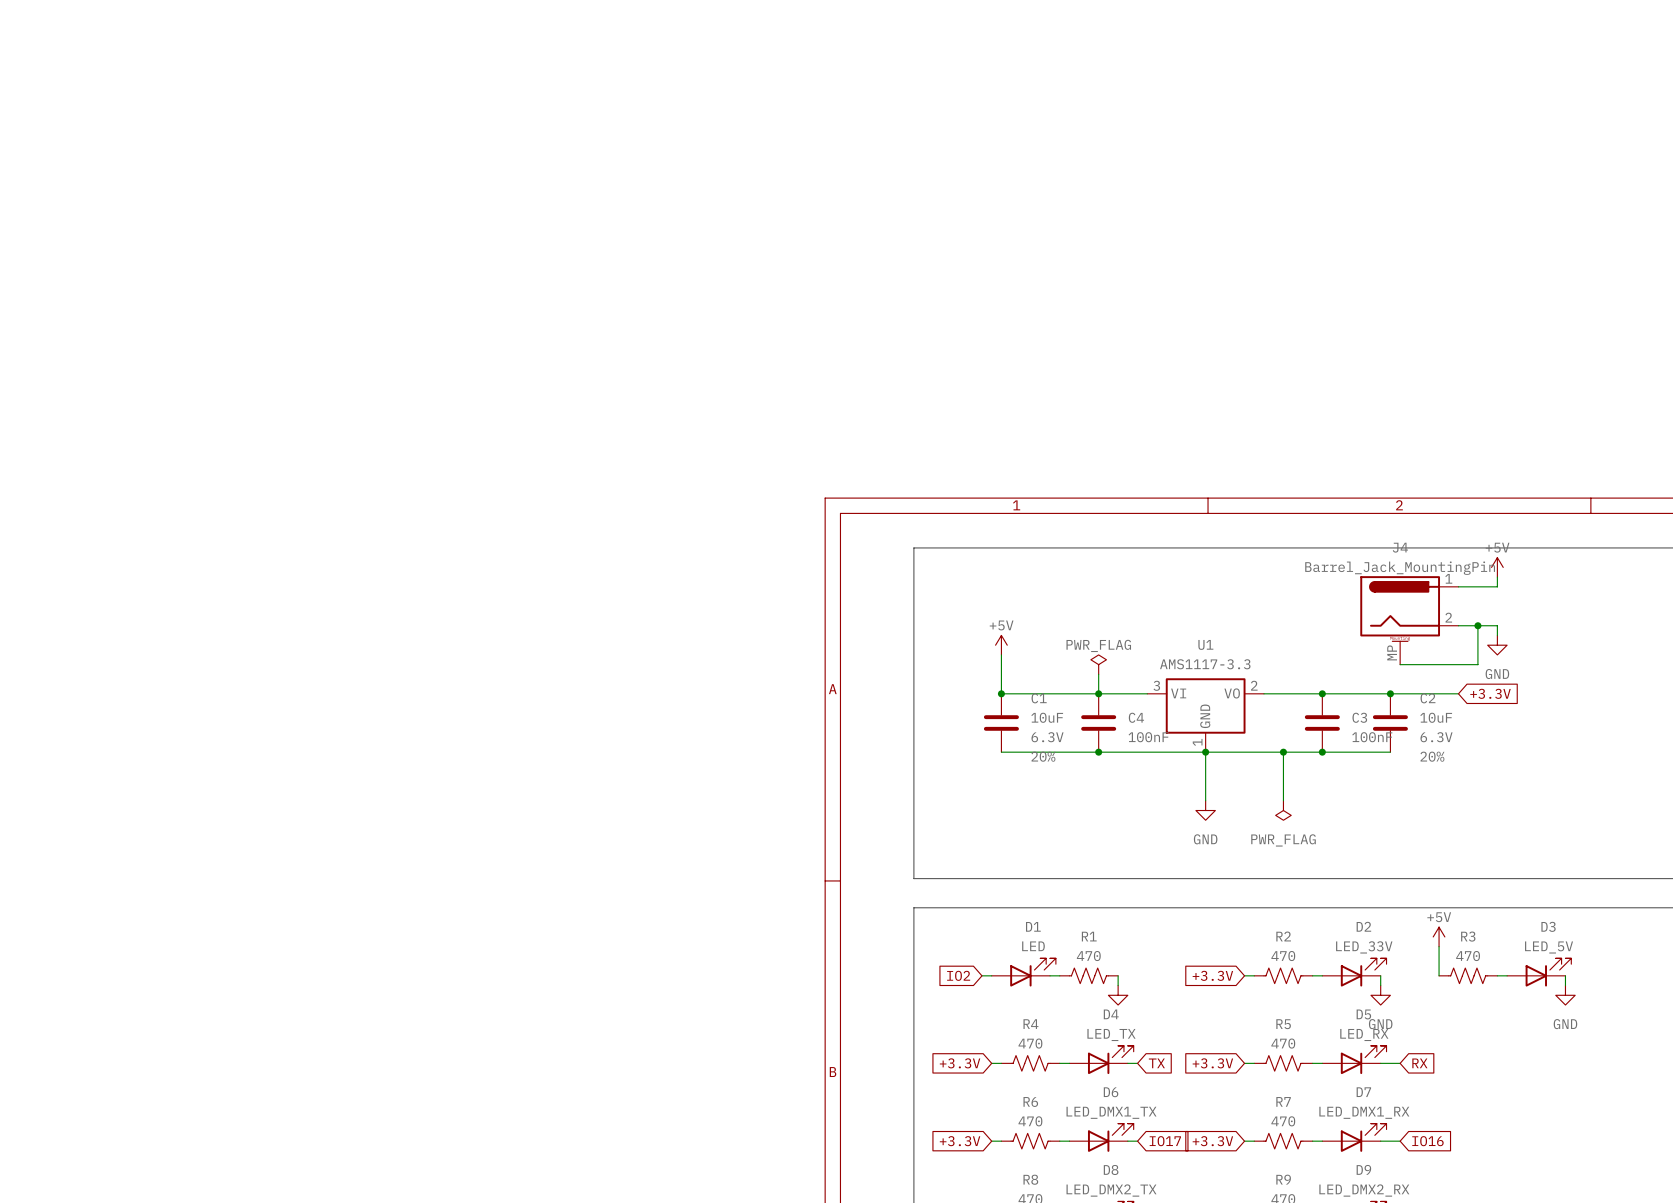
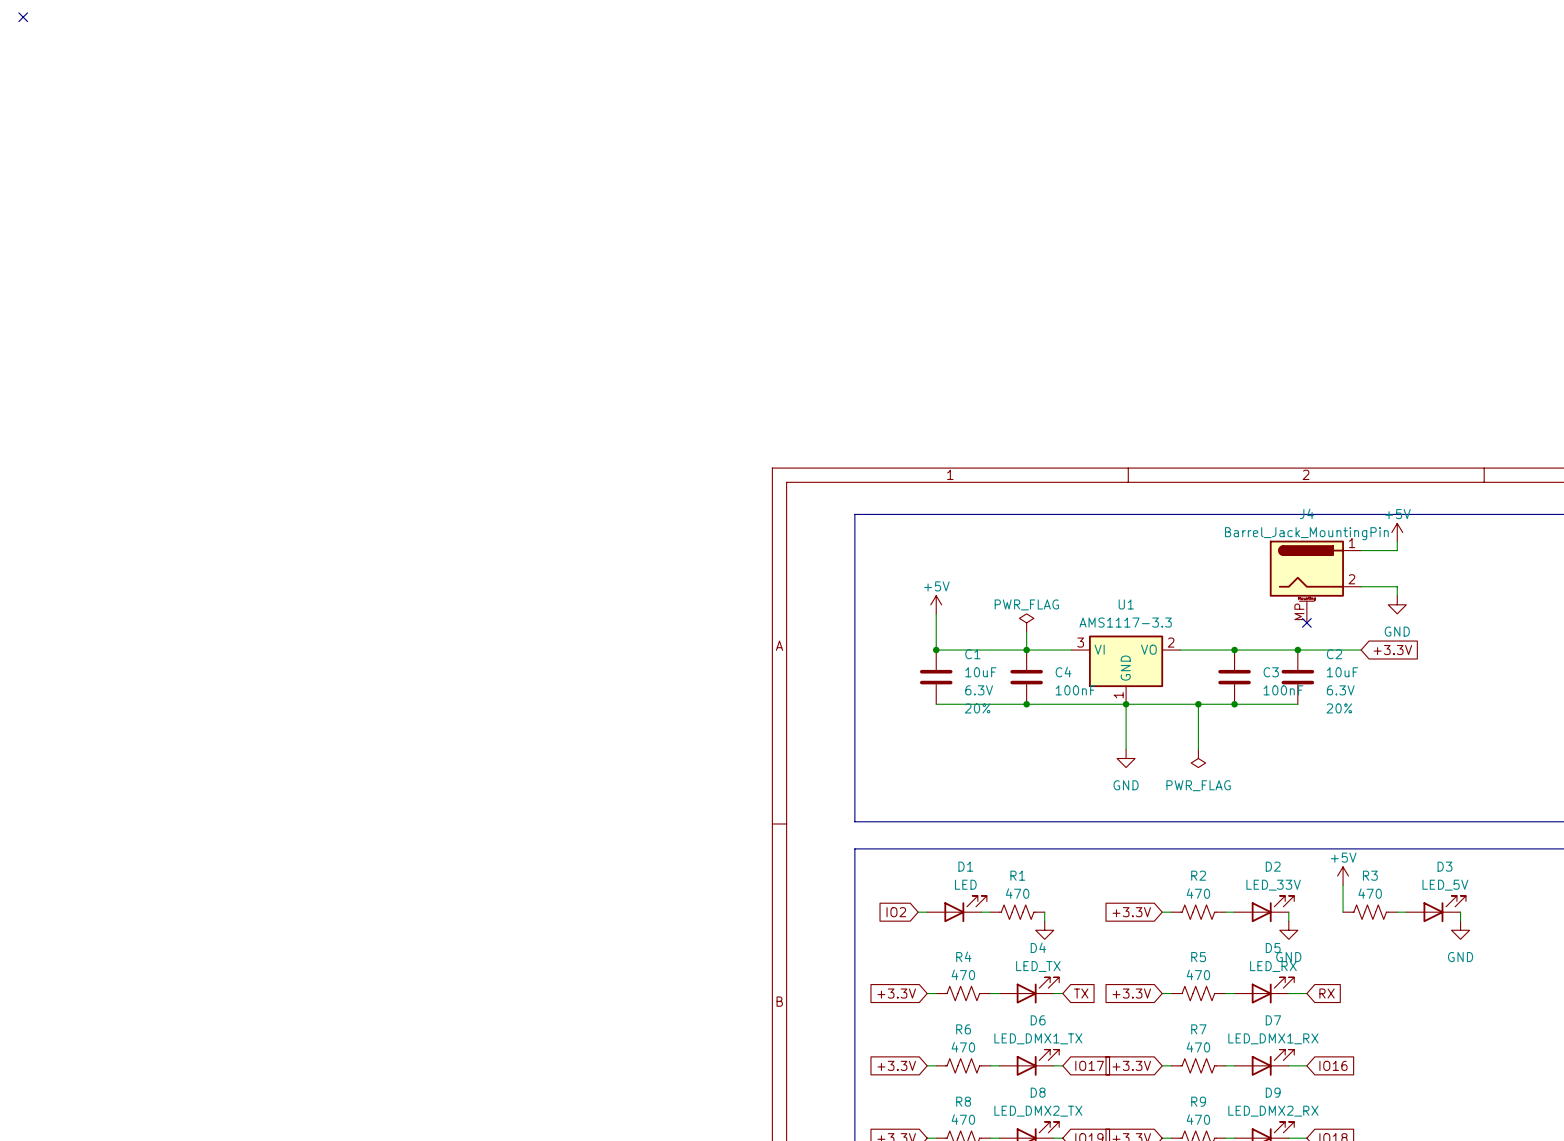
no-connect mark: none -> (23, 17)
wire: (1477, 625) (1477, 664) (1400, 664) -> none
junction: (1477, 625) -> none
no-connect mark: none -> (1306, 622)

